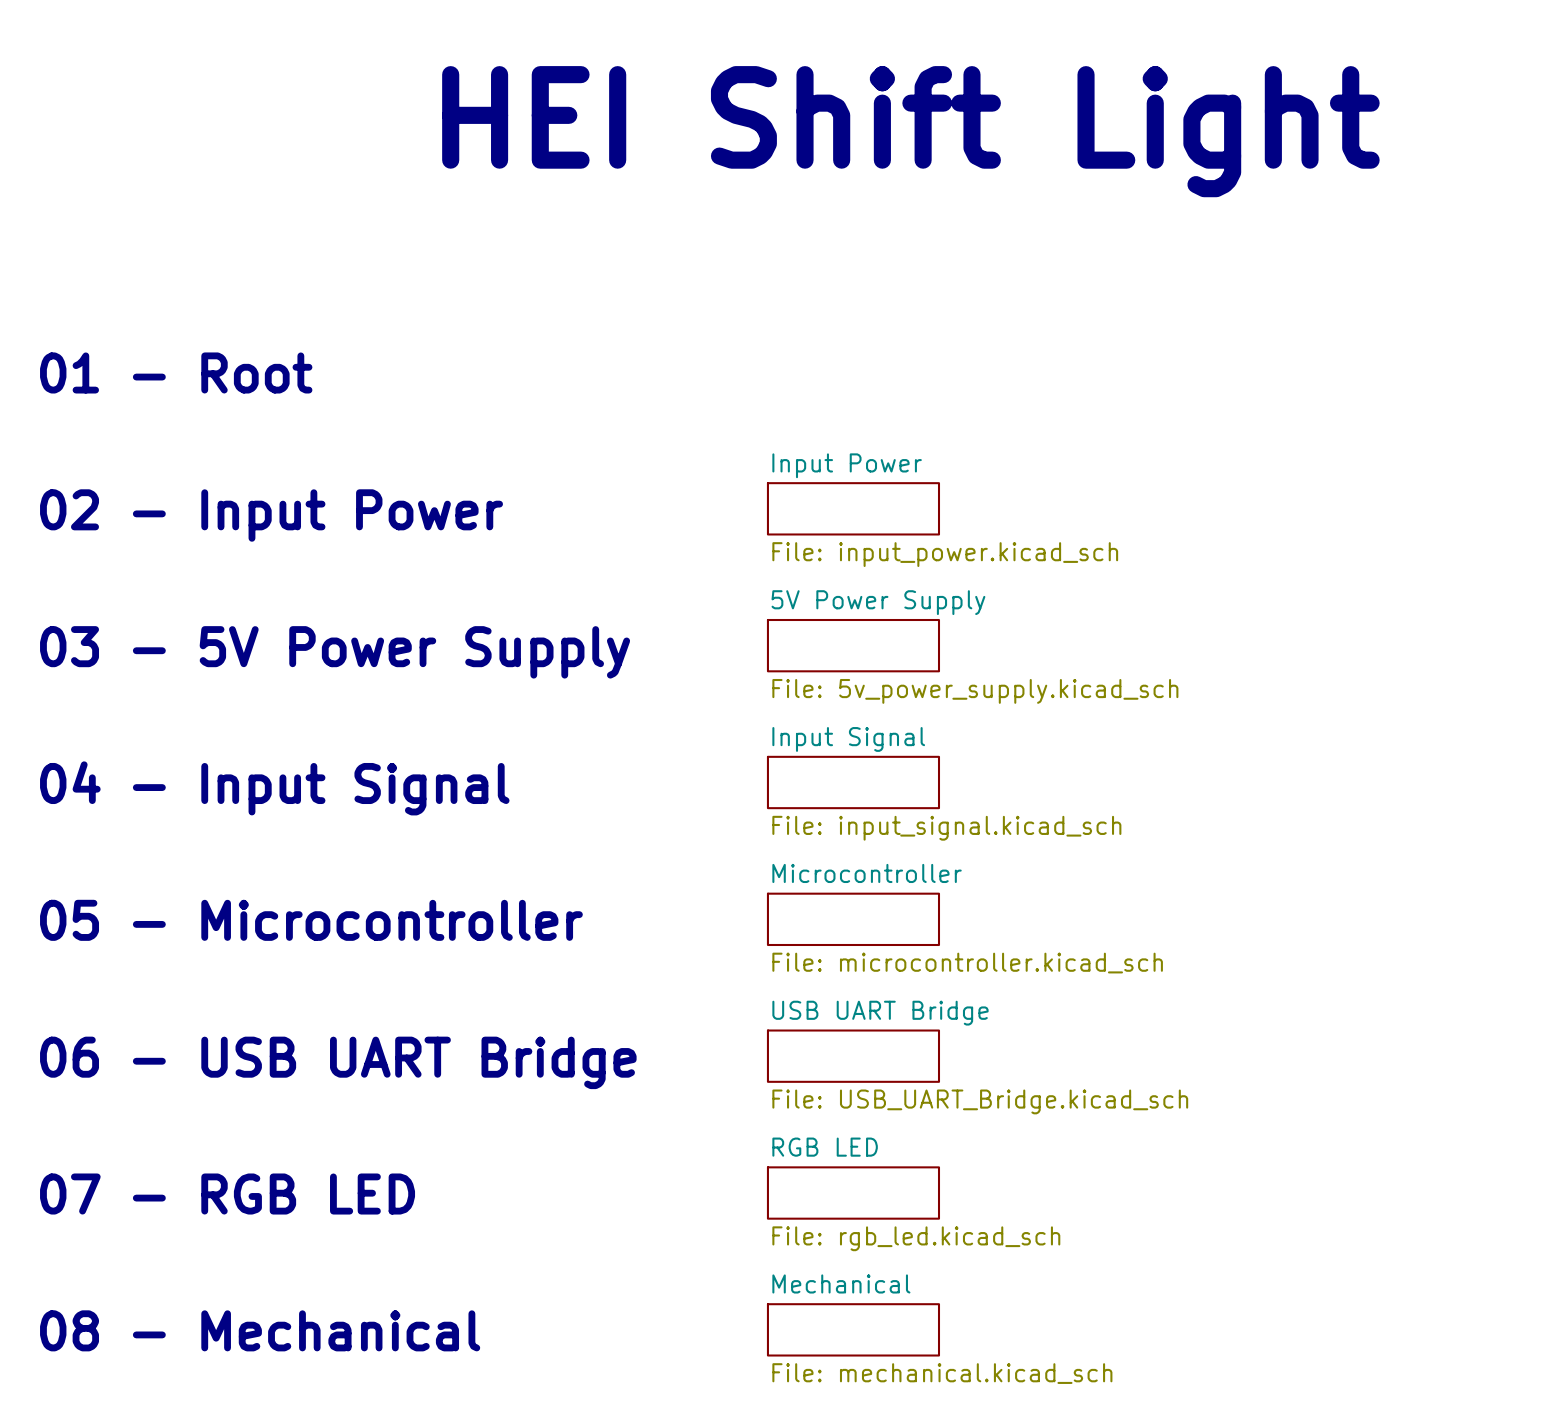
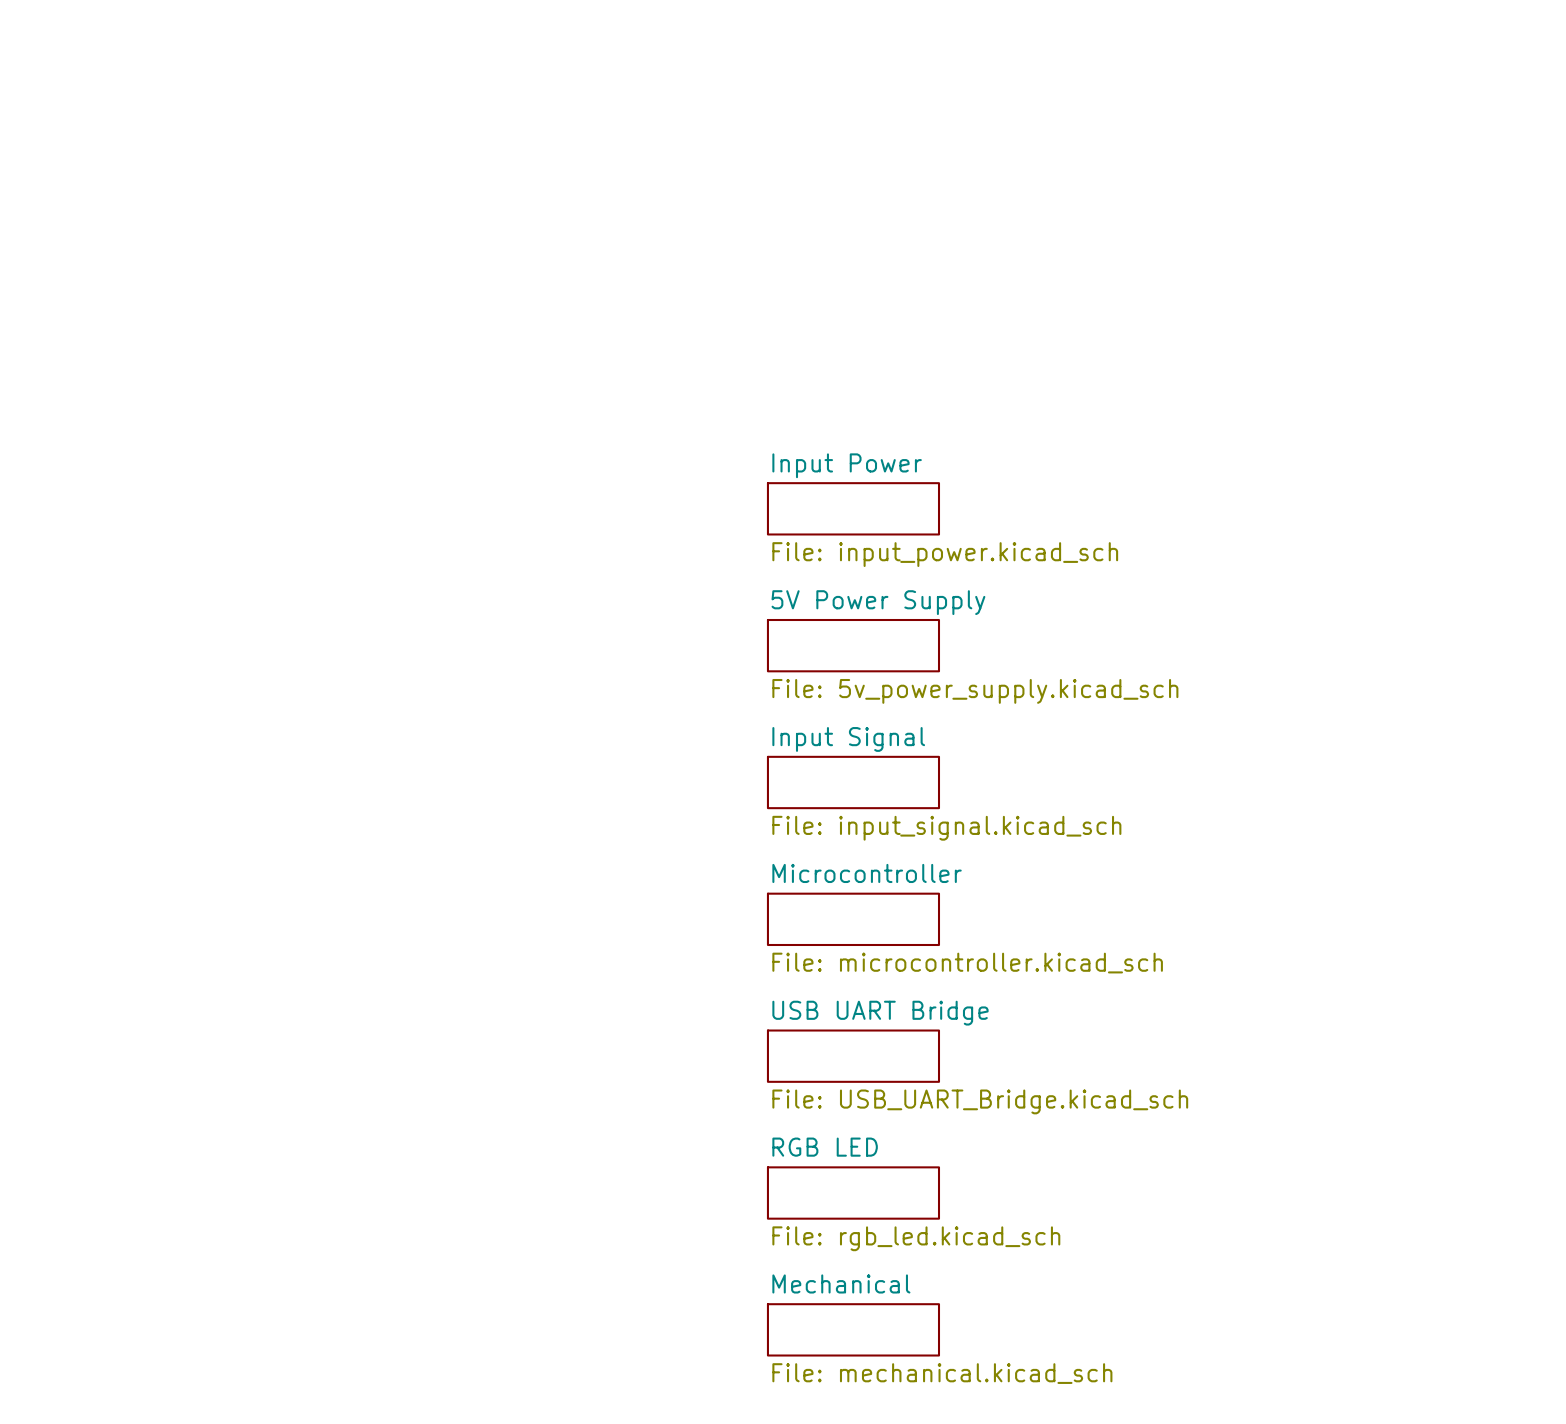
text: HEI Shift Light (910, 131) -> none
text: 01 - Root (176, 372) -> none
text: 02 - Input Power (271, 515) -> none
text: 03 - 5V Power Supply (335, 652) -> none
text: 04 - Input Signal (274, 788) -> none
text: 05 - Microcontroller (311, 920) -> none
text: 06 - USB UART Bridge (338, 1062) -> none
text: 07 - RGB LED (227, 1194) -> none
text: 08 - Mechanical (260, 1330) -> none

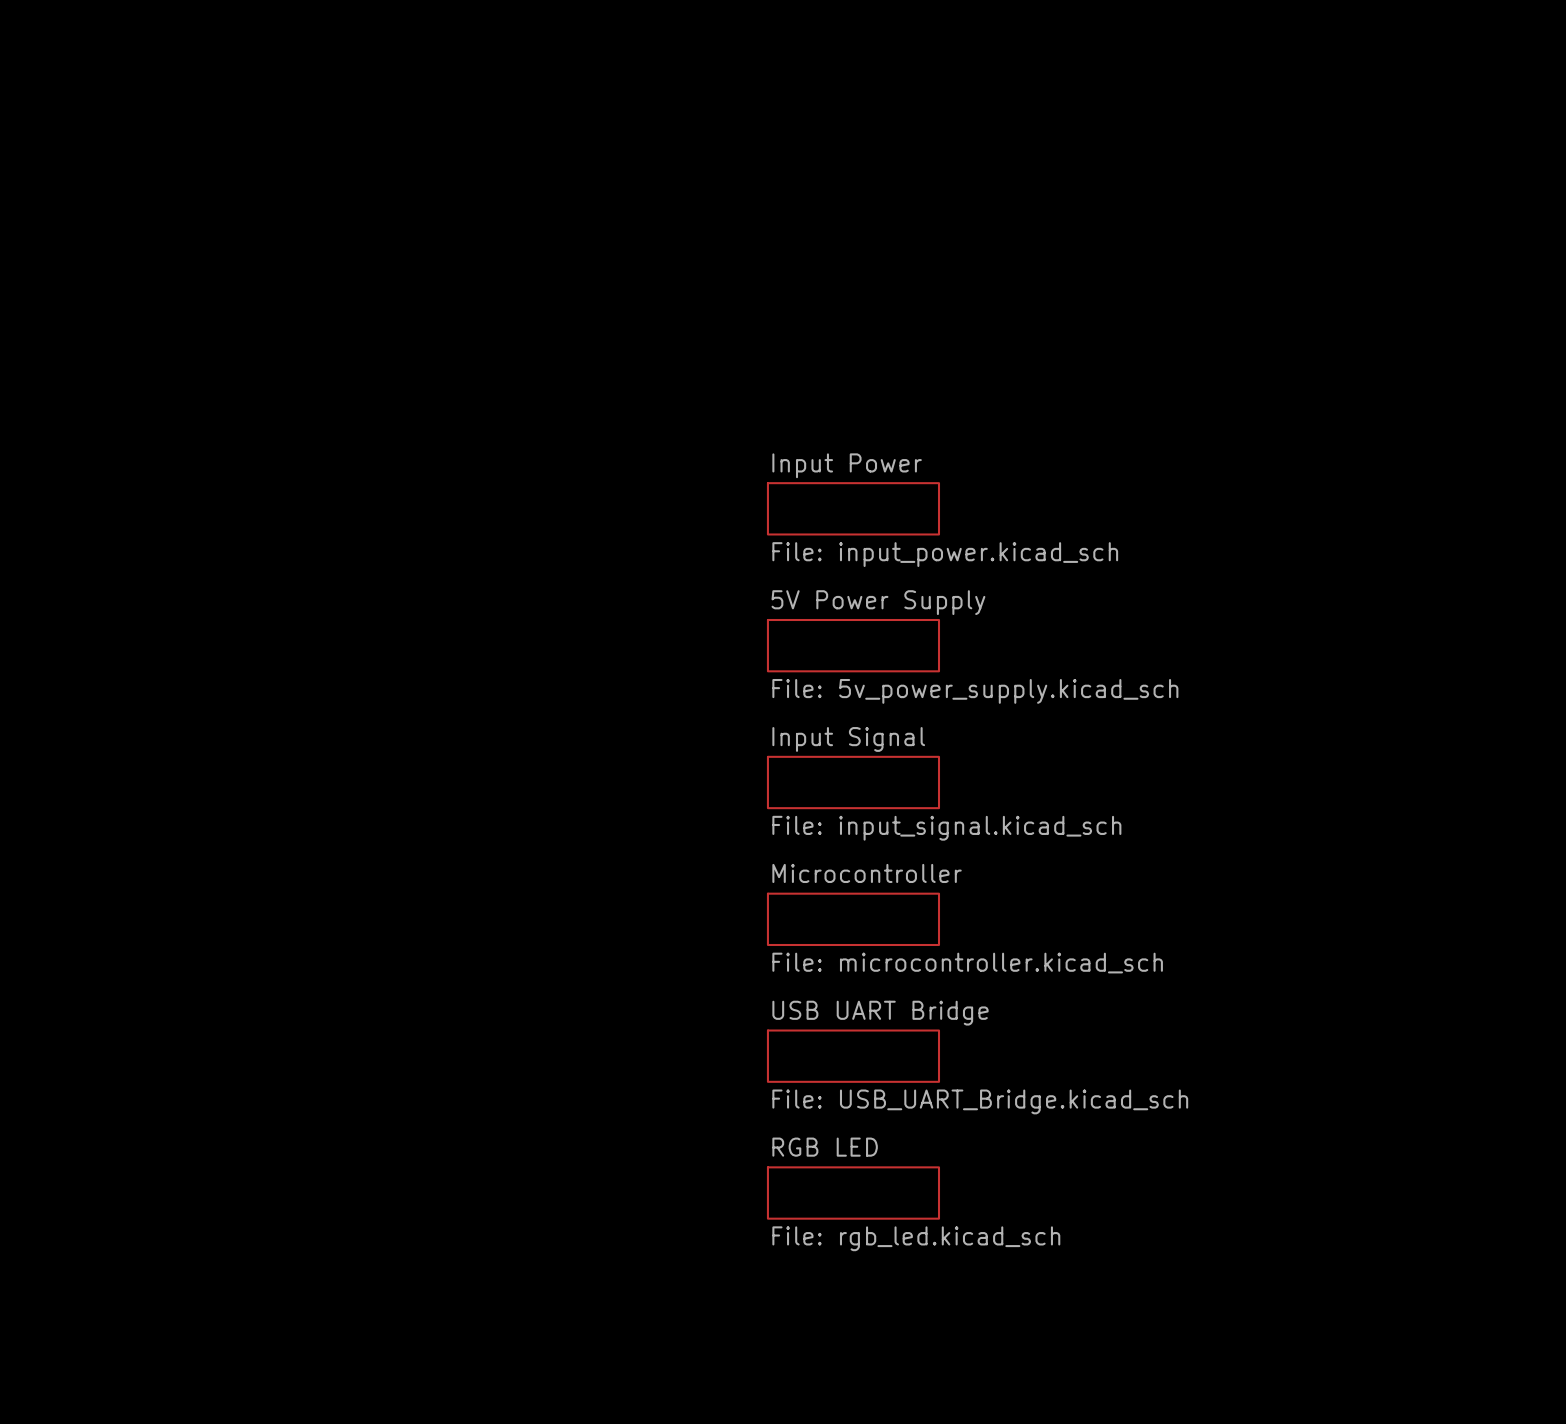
sheet Mechanical: File: mechanical.kicad_sch (853, 1329) -> none

